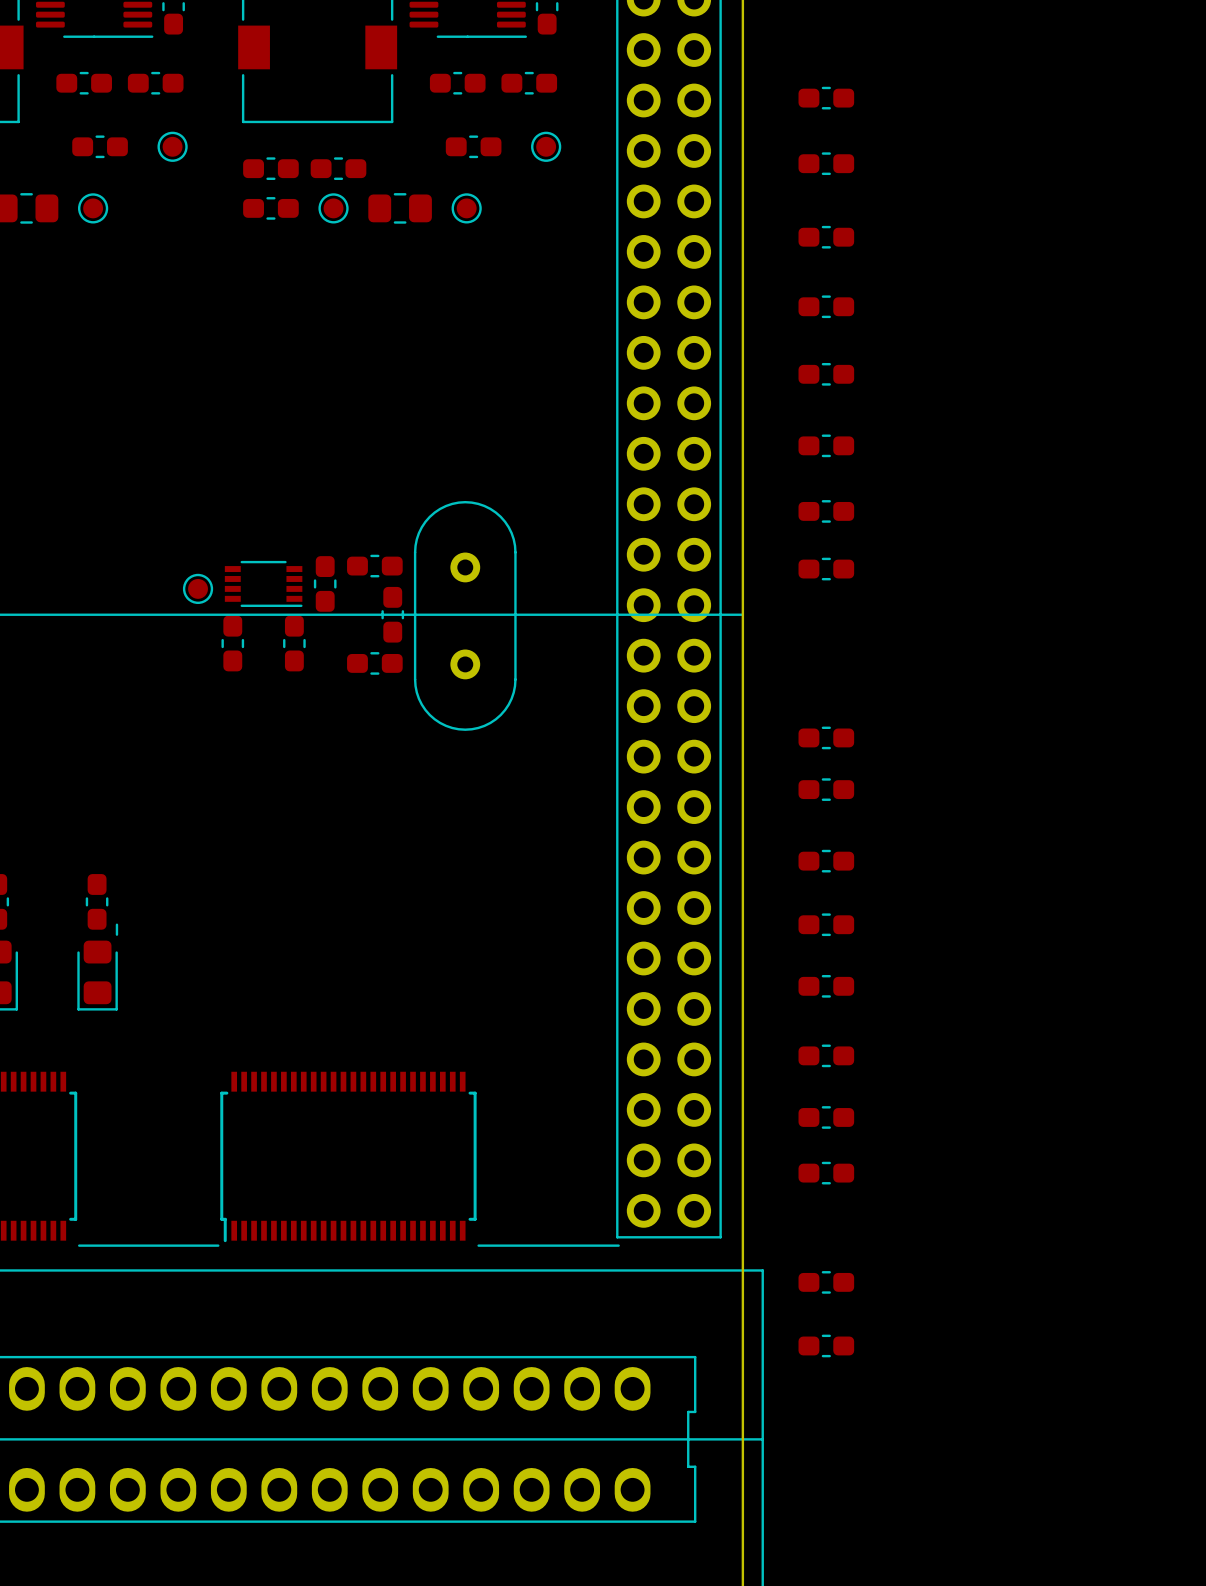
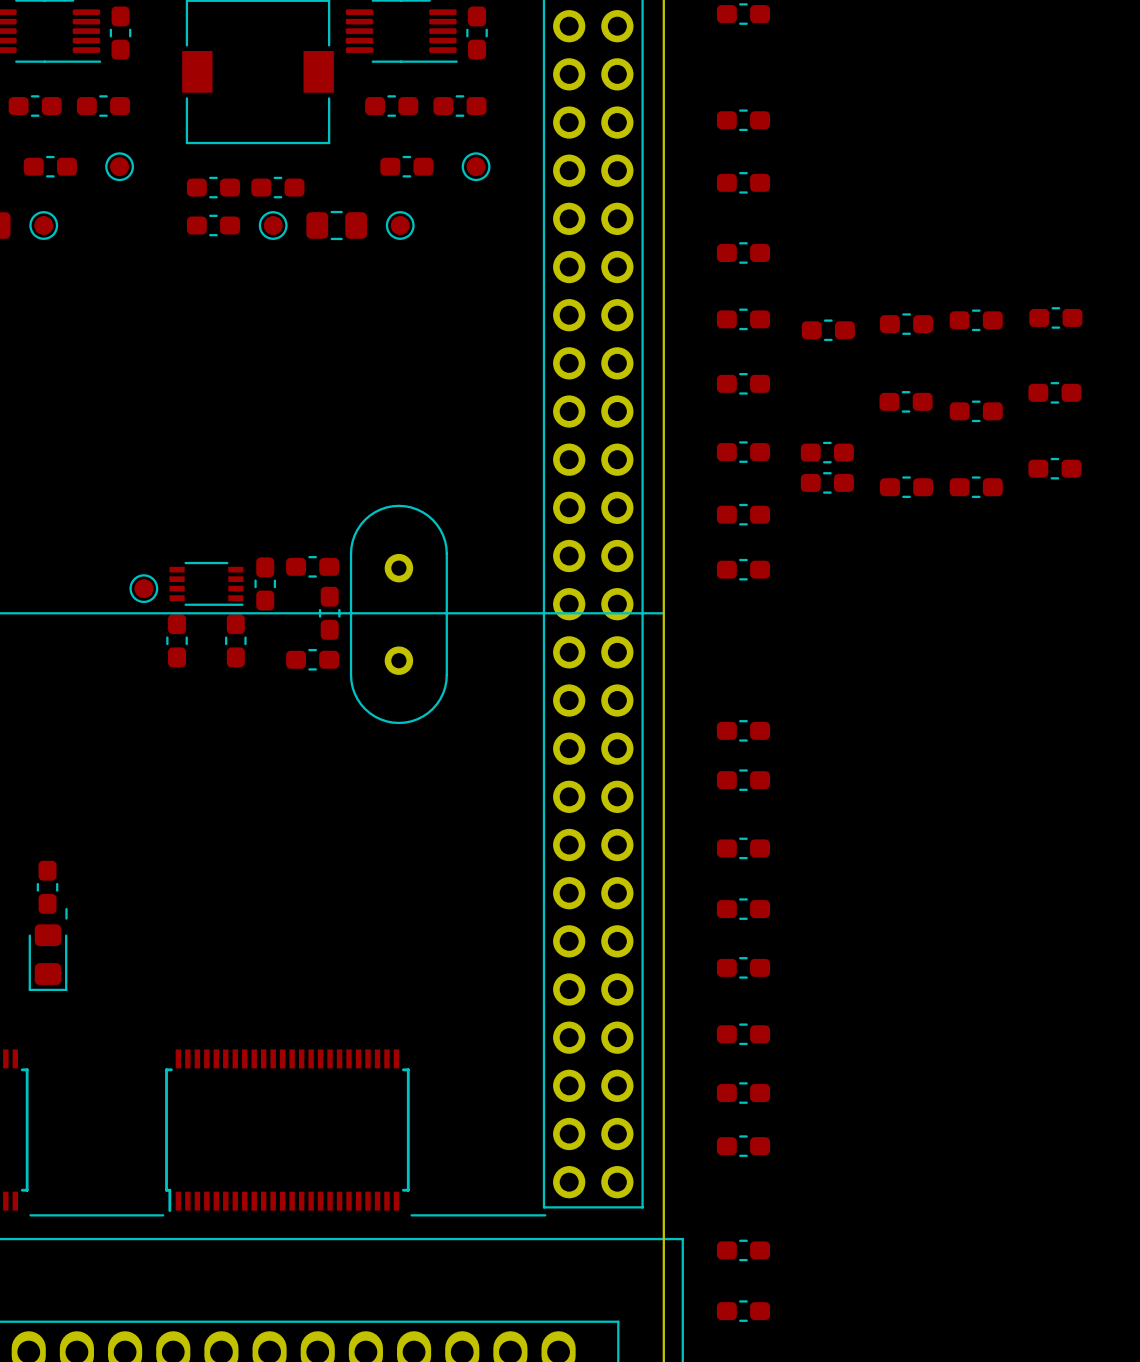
part: none -> (1055, 317)
part: none -> (976, 320)
part: none -> (906, 324)
part: none -> (828, 330)
part: none -> (1054, 392)
part: none -> (906, 401)
part: none -> (976, 411)
part: none -> (827, 452)
part: none -> (1054, 468)
part: none -> (827, 482)
part: none -> (906, 487)
part: none -> (976, 487)

